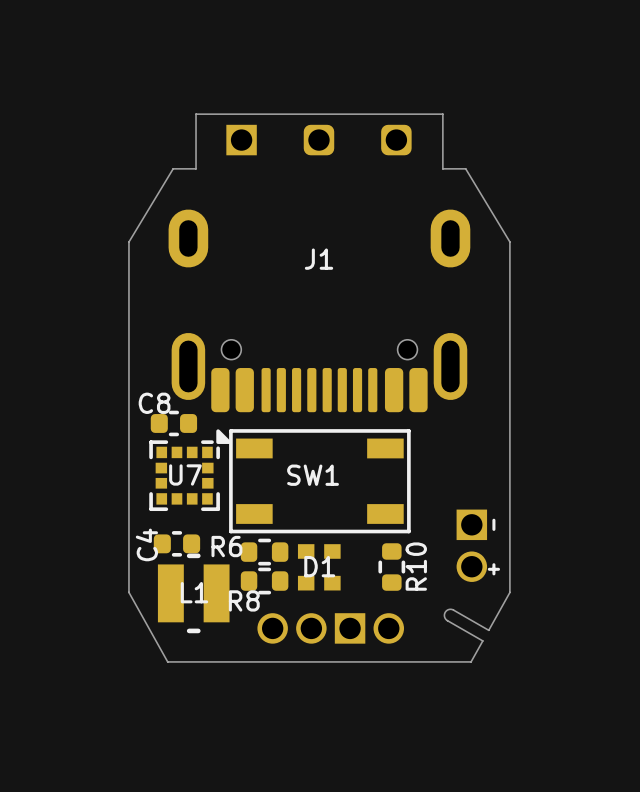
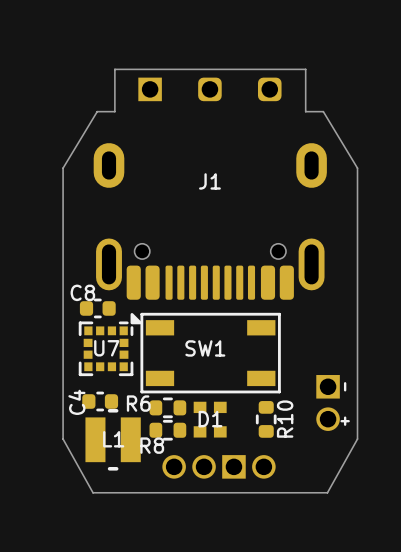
board edge: (509, 592) (488, 630) (452, 609) (448, 609) (445, 612) (444, 616) (446, 620) (482, 640) (471, 661) -> (357, 439) (327, 492)

